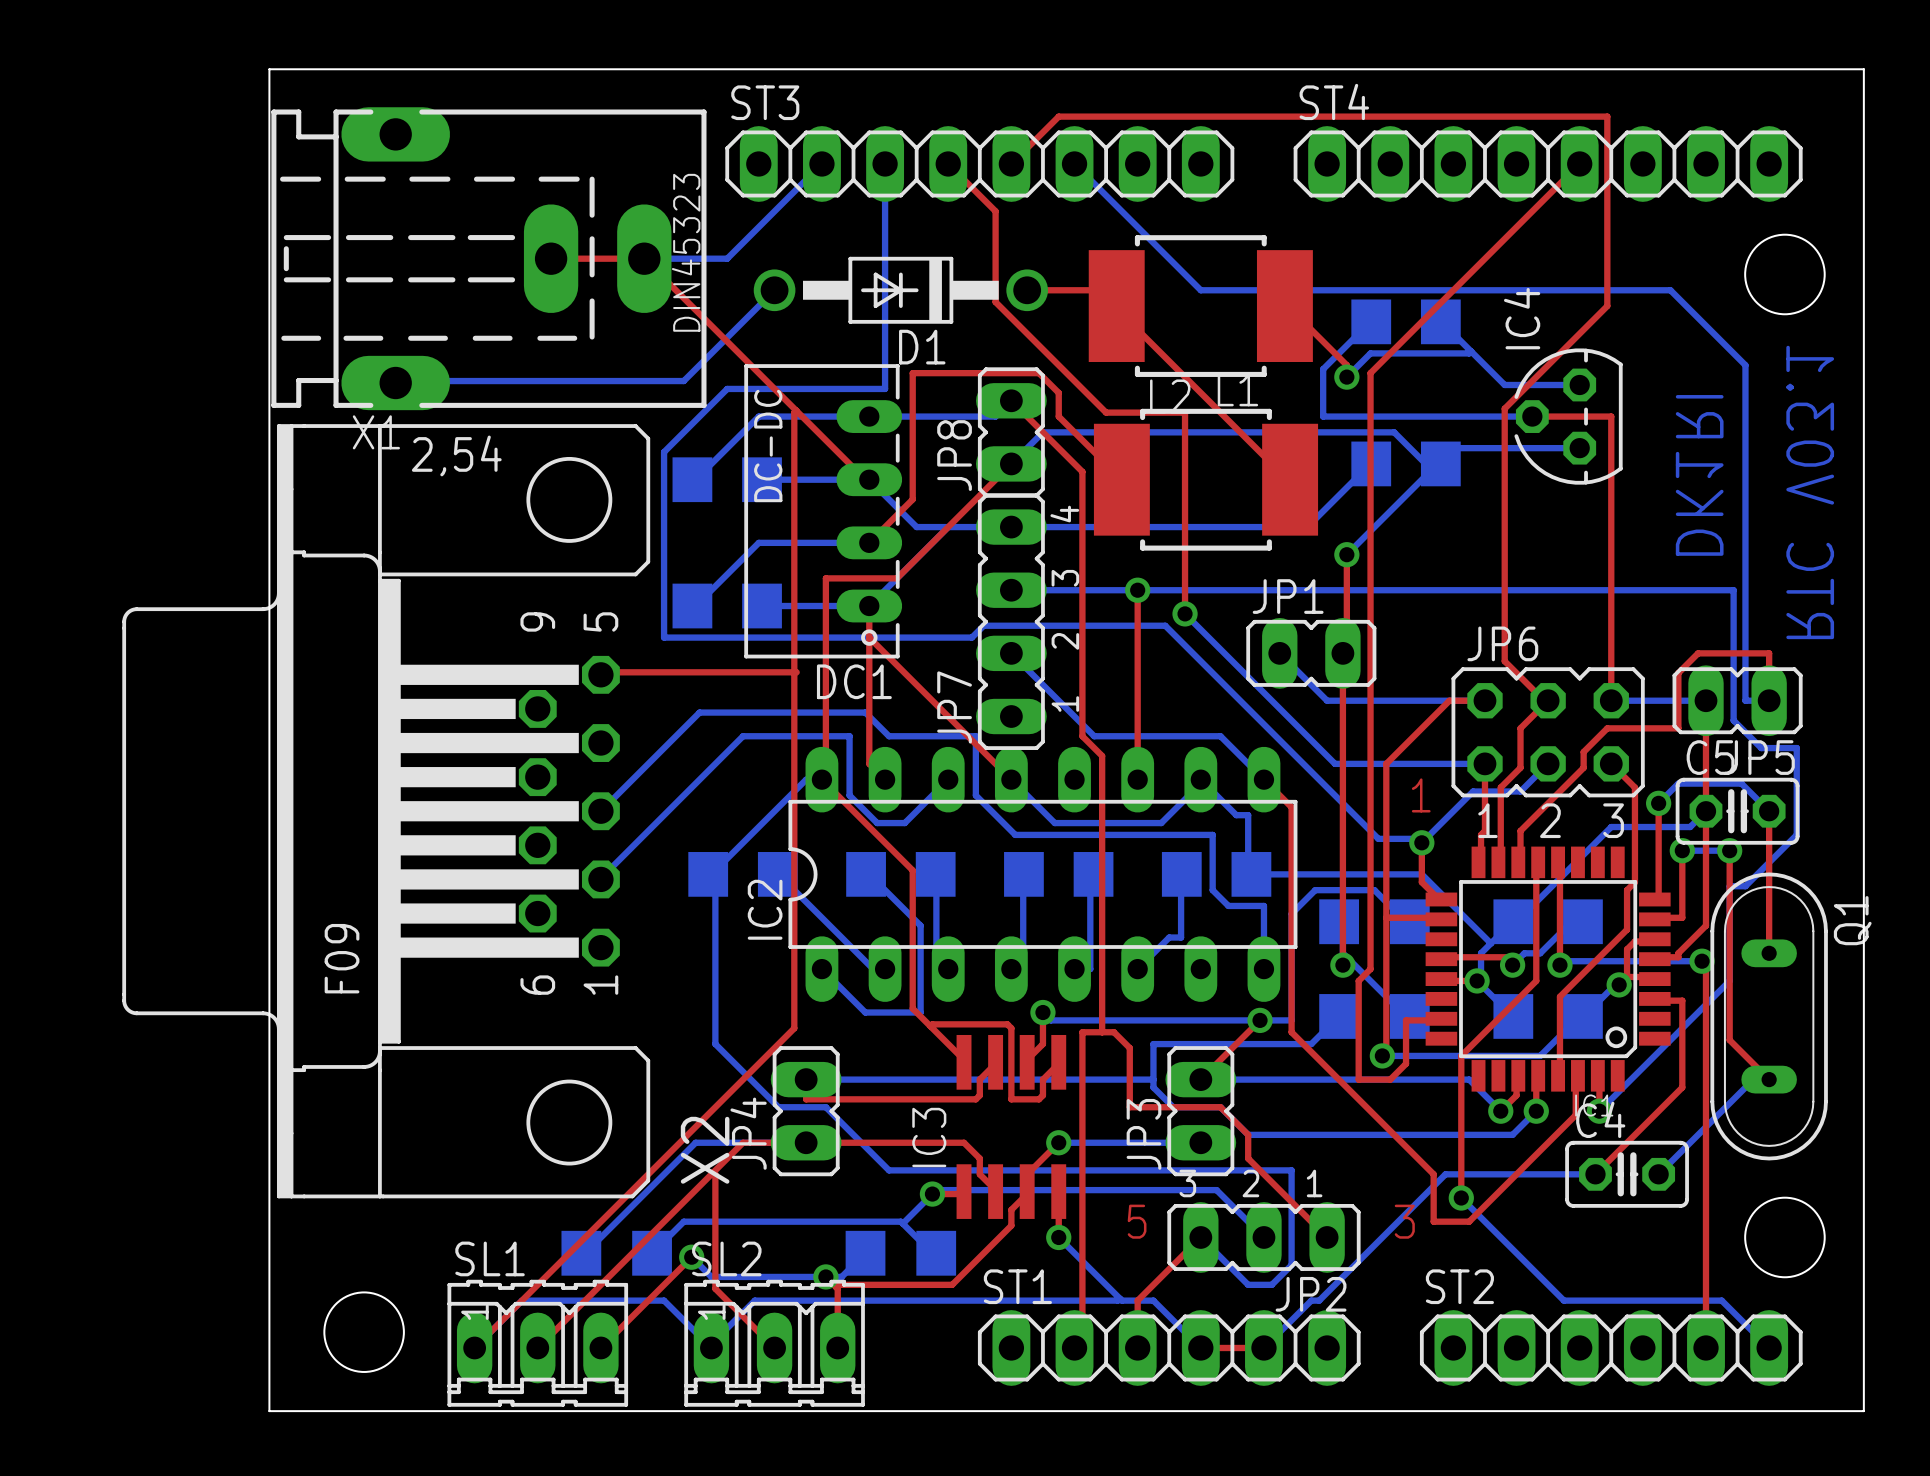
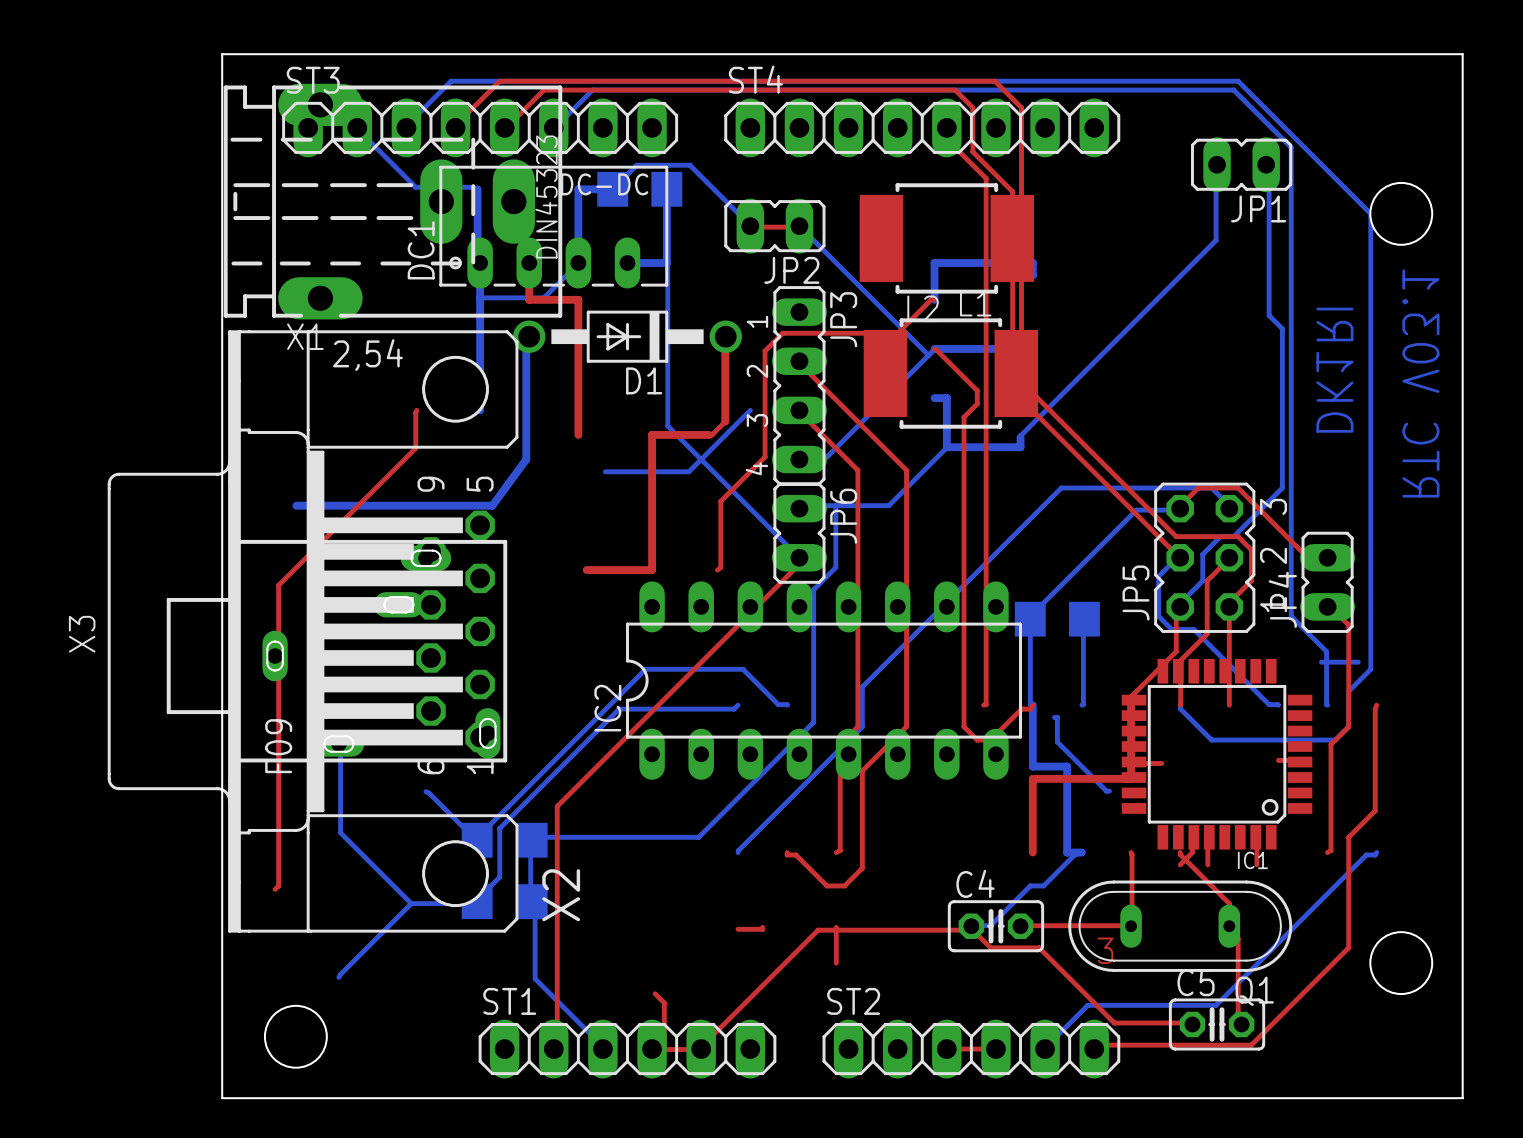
bottom track: none -> (357, 127) (415, 187) (473, 187) (477, 189) (477, 262) (480, 262) (480, 410)
bottom track: none -> (406, 127) (451, 81) (1238, 81) (1370, 213) (1370, 669) (1348, 691) (1348, 726) (1335, 740) (1211, 740) (1180, 709) (1180, 705)
top track: none -> (455, 127) (455, 125) (499, 81) (994, 81) (1021, 107) (1021, 381) (1176, 536) (1238, 536) (1251, 549) (1251, 580) (1229, 602) (1229, 705)
top track: none -> (504, 127) (543, 90) (955, 90) (972, 107) (972, 151) (1012, 191) (1012, 390) (1180, 557)
bottom track: none -> (553, 127) (592, 90) (1233, 90) (1291, 147) (1291, 616) (1326, 651) (1327, 705)
bottom track: (821, 163) (727, 258) (644, 258) -> none
bottom track: (885, 163) (885, 388) (727, 388) (664, 452) (664, 637) (971, 637) (983, 625) (1165, 625) (1378, 838) (1421, 838) (1421, 842) (1473, 791) (1520, 791) (1548, 763) -> none
top track: (948, 163) (995, 211) (995, 302) (1106, 412) (1185, 412) (1185, 613) -> none
ST3 position: (979, 163) -> (480, 127)
top track: (1011, 163) (1058, 116) (1607, 116) (1607, 306) (1504, 408) (1504, 661) (1544, 700) (1548, 700) (1520, 728) (1520, 767) (1500, 787) (1500, 858) (1498, 862) -> none
bottom track: (1074, 163) (1200, 290) (1670, 290) (1745, 365) (1745, 700) (1769, 700) -> none
top track: none -> (946, 127) (950, 129) (950, 143) (986, 178) (986, 704) (983, 705)
ST4 position: (1548, 163) -> (922, 127)
top track: (1579, 163) (1370, 373) (1370, 969) (1358, 980) (1358, 1079) (1390, 1079) (1406, 1063) (1406, 1020) (1441, 1018) -> none
bottom track: none -> (1217, 164) (1216, 240) (1021, 434) (1020, 447) (946, 447)
bottom track: none -> (1266, 164) (1269, 165) (1269, 315) (1282, 328) (1282, 488) (1233, 536) (1220, 536) (1202, 554) (1202, 580) (1180, 602) (1180, 606)
part: none -> (639, 189)
bottom track: none -> (666, 189) (666, 262) (627, 262)
top track: (551, 258) (644, 258) (865, 479) (869, 479) -> none
bottom track: (774, 290) (683, 381) (395, 381) (395, 383) -> none
D1 position: (900, 290) -> (627, 336)
bottom track: none -> (750, 226) (689, 165) (636, 165) (612, 189) (578, 189) (578, 262) (543, 297) (480, 297)
top track: none -> (750, 226) (799, 226)
bottom track: none -> (799, 226) (928, 355) (934, 348)
top track: (1027, 290) (1113, 290) (1113, 306) (1117, 306) (1117, 310) (1287, 479) (1290, 479) -> none
top track: (1284, 306) (1287, 306) (1346, 365) (1346, 377) -> none
bottom track: (1371, 321) (1323, 369) (1323, 416) (1532, 416) -> none
part: (1406, 321) -> none
bottom track: (1440, 321) (1504, 384) (1579, 384) -> none
top track: none -> (529, 262) (529, 299) (578, 299) (578, 434)
bottom track: none -> (666, 262) (667, 426) (799, 557)
bottom track: none -> (1020, 272) (1020, 275) (1032, 275) (1032, 262) (934, 262) (934, 299)
bottom track: (1471, 351) (1469, 353) (1370, 353) (1346, 377) -> none
via: (1346, 377) -> none
top track: none -> (934, 299) (933, 297) (897, 333) (782, 333) (765, 350) (765, 457) (720, 501) (720, 567) (717, 570)
bottom track: (1011, 400) (995, 416) (758, 416) (695, 479) (692, 479) -> none
top track: (1011, 400) (1082, 471) (1082, 736) (1102, 755) (1102, 1032) -> none
top track: (796, 410) (794, 412) (794, 1028) (474, 1347) -> none
top track: (1532, 416) (1611, 416) (1611, 700) -> none
IC4: (1568, 416) -> none
bottom track: none -> (529, 336) (526, 337) (526, 459) (492, 505) (295, 507)
top track: none -> (725, 336) (725, 421) (712, 434) (652, 434) (652, 570) (586, 570)
JP8: (1011, 432) -> none
bottom track: none -> (934, 348) (1020, 348)
top track: none -> (934, 348) (977, 390) (977, 403) (964, 417) (964, 726) (977, 740) (990, 740) (1021, 709) (1030, 709) (1032, 705)
bottom track: (1579, 448) (1457, 448) (1441, 463) (1437, 463) (1346, 554) -> none
bottom track: (1011, 463) (1042, 432) (1394, 432) (1429, 467) (1440, 463) -> none
top track: (1011, 463) (896, 578) (825, 578) (825, 779) (821, 779) (912, 870) (912, 1008) (964, 1059) (964, 1062) -> (799, 361) (906, 470) (906, 726) (862, 770) (862, 868) (844, 885) (826, 885) (796, 854) (787, 854) (787, 852)
bottom track: (1371, 463) (1307, 527) (916, 527) (869, 479) (762, 479) -> none
part: (1406, 463) -> none
part: (727, 479) -> none
top track: (1121, 479) (1058, 416) (1058, 392) (1039, 373) (912, 373) (912, 499) (869, 542) -> none
DC1 rotation: 0° (823, 511) -> 90° clockwise (553, 227)
DC1 position: (823, 511) -> (553, 227)
bottom track: none -> (934, 398) (946, 398) (946, 447)
top track: none -> (416, 410) (415, 448) (278, 585) (278, 885) (275, 889)
top track: none -> (799, 410) (857, 470) (857, 726) (840, 744) (840, 850) (836, 852)
bottom track: (869, 542) (758, 542) (695, 606) (692, 606) -> none
top track: (1346, 554) (1346, 649) (1342, 653) (1342, 965) -> none
via: (1346, 554) -> none
bottom track: (1011, 590) (1733, 590) (1733, 720) (1761, 748) (1796, 748) (1796, 834) (1745, 886) (1729, 886) (1729, 980) (1599, 1111) -> (799, 459) (800, 457) (826, 457) (934, 348)
top track: (1137, 590) (1137, 779) -> none
via: (1137, 590) -> none
JP1 name position: JP1 (1288, 596) -> JP1 (1258, 208)
part: (727, 606) -> none
top track: (869, 606) (869, 763) (885, 779) -> none
bottom track: (1185, 613) (1335, 763) (1484, 763) -> none
via: (1185, 613) -> none
JP7: (1011, 621) -> none
top track: (869, 637) (1011, 779) -> none
JP6 name position: JP6 (1502, 643) -> JP6 (843, 516)
bottom track: none -> (835, 505) (835, 567) (813, 589) (813, 722) (698, 837) (535, 837) (530, 841) (530, 899) (535, 903) (535, 978) (601, 1045) (602, 1049)
bottom track: (1011, 653) (1094, 736) (1220, 736) (1263, 779) -> (799, 508) (800, 505) (888, 505) (946, 447)
bottom track: (1279, 653) (1327, 700) (1484, 700) -> none
JP1 position: (1311, 653) -> (1241, 164)
bottom track: none -> (1180, 508) (1136, 510) (1030, 616) (1032, 766) (1067, 766) (1067, 852) (1081, 852) (1074, 854) (1043, 885) (1030, 885) (990, 925) (971, 926)
top track: none -> (1180, 508) (1180, 505) (1198, 488) (1238, 488) (1304, 554) (1326, 554) (1327, 557)
bottom track: none -> (1229, 508) (1229, 505) (1211, 488) (1061, 488) (862, 686) (862, 726) (738, 852)
JP5 footprint: [1672, 665, 1803, 737] -> [1154, 482, 1256, 633]
JP6 footprint: [1451, 667, 1645, 798] -> [771, 482, 827, 584]
top track: (796, 672) (603, 672) (600, 674) -> none
top track: (1484, 700) (1449, 700) (1386, 763) (1386, 1051) (1382, 1055) -> none
bottom track: (1611, 700) (1706, 700) -> none
top track: (1706, 700) (1706, 925) (1678, 953) (1678, 957) (1658, 957) (1654, 959) -> none
top track: (1769, 700) (1769, 653) (1698, 653) (1678, 673) (1678, 728) (1607, 728) (1583, 752) (1583, 767) (1520, 830) (1520, 858) (1518, 862) -> none
top track: none -> (799, 557) (796, 558) (796, 567) (557, 806) (557, 1045) (553, 1049)
bottom track: none -> (1180, 557) (1176, 558) (1158, 576) (1158, 616) (1171, 629) (1193, 629) (1269, 704) (1278, 705)
top track: none -> (1229, 557) (1207, 580) (1207, 633) (1180, 660) (1180, 705)
JP5 name position: JP5 (1759, 757) -> JP5 (1135, 593)
top track: (1484, 763) (1484, 830) (1481, 834) (1481, 858) (1478, 862) -> none
top track: (1611, 763) (1634, 787) (1634, 882) (1627, 890) (1627, 929) (1559, 996) (1559, 1075) (1558, 1075) -> none
bottom track: (821, 779) (806, 779) (711, 874) -> none
bottom track: (948, 779) (904, 823) (877, 823) (849, 795) (849, 736) (743, 736) (600, 879) -> none
bottom track: (1011, 779) (1054, 823) (1161, 823) (1200, 783) (1200, 779) (1236, 815) (1248, 815) (1248, 874) (1421, 874) (1490, 943) -> none
top track: (1263, 779) (1291, 807) (1291, 1032) (1433, 1174) (1433, 1221) (1469, 1221) (1575, 1115) (1575, 1079) (1577, 1075) -> none
top track: none -> (1180, 606) (1176, 607) (1176, 651) (1132, 695) (1131, 778) (1032, 778) (1032, 852)
top track: none -> (1327, 606) (1331, 607) (1348, 625) (1348, 726) (1331, 744) (1331, 850) (1327, 852)
part: none -> (1057, 619)
bottom track: none -> (1084, 619) (1081, 705)
text: 1 (1421, 795) -> none
bottom track: (1658, 803) (1678, 783) (1741, 783) (1769, 811) -> none
top track: (1658, 803) (1658, 898) (1654, 899) -> none
via: (1658, 803) -> none
bottom track: (600, 811) (699, 712) (865, 712) (889, 736) (975, 736) (975, 795) (1015, 834) (1212, 834) (1212, 890) (1228, 905) (1263, 905) (1263, 969) -> none
bottom track: (1706, 811) (1690, 827) (1611, 827) (1516, 921) (1512, 921) (1481, 953) (1481, 980) (1477, 980) (1513, 1016) -> none
C5 position: (1737, 811) -> (1217, 1024)
top track: (1769, 811) (1769, 953) -> none
X3: none -> (336, 651)
top track: (1421, 842) (1421, 882) (1441, 899) -> none
via: (1421, 842) -> none
top track: (1682, 850) (1682, 917) (1654, 919) -> none
via: (1682, 850) -> none
top track: (1729, 850) (1729, 1040) (1769, 1079) -> none
via: (1729, 850) -> none
top track: (1538, 862) (1536, 862) (1536, 980) (1461, 1055) (1461, 1198) -> none
top track: (1558, 862) (1559, 862) (1559, 965) -> none
bottom track: (708, 874) (715, 874) (715, 1044) (778, 1107) (825, 1107) (889, 1170) (1291, 1170) (1291, 1265) (1271, 1284) (1248, 1284) (1200, 1237) -> none
part: (743, 874) -> none
bottom track: (777, 874) (873, 969) (885, 969) -> none
bottom track: (866, 874) (869, 874) (920, 925) (920, 1012) (865, 1012) (821, 969) -> none
part: (900, 874) -> none
bottom track: (935, 874) (936, 969) (948, 969) -> none
bottom track: (1023, 874) (1023, 969) (1011, 969) -> none
part: (1058, 874) -> none
bottom track: (1093, 874) (1090, 874) (1090, 969) (1074, 969) -> none
bottom track: (1181, 874) (1181, 937) (1169, 937) (1137, 969) -> none
part: (1216, 874) -> none
bottom track: none -> (738, 705) (734, 709) (619, 709) (499, 828) (499, 877) (477, 901) (473, 903) (411, 903)
bottom track: none -> (787, 705) (778, 704) (742, 669) (645, 669) (477, 837) (477, 840) (425, 791)
top track: none -> (1376, 705) (1375, 810) (1348, 837) (1348, 947) (1251, 1045) (1096, 1045) (1094, 1049)
top track: (1386, 917) (1441, 919) -> none
part: (1374, 921) -> none
bottom track: (1409, 921) (1406, 921) (1374, 890) (1315, 890) (1291, 913) (1291, 1020) (1050, 1020) (1042, 1012) -> none
part: (1548, 921) -> none
bottom track: (1582, 921) (1571, 921) (1540, 953) (1524, 953) (1512, 965) -> none
top track: (1654, 939) (1654, 941) (1634, 941) (1627, 949) (1627, 976) (1619, 984) -> none
bottom track: none -> (338, 744) (340, 744) (340, 832) (411, 903)
top track: (1441, 959) (1441, 957) (1512, 957) (1512, 965) -> none
bottom track: (1702, 961) (1563, 961) (1559, 965) -> none
top track: (1702, 961) (1706, 965) (1706, 1347) -> none
via: (1702, 961) -> none
via: (1342, 965) -> none
via: (1512, 965) -> none
via: (1559, 965) -> none
via: (1477, 980) -> none
bottom track: (1619, 984) (1615, 984) (1583, 1016) (1579, 1016) (1540, 1055) (1382, 1055) -> none
via: (1619, 984) -> none
top track: (1654, 998) (1682, 1000) (1682, 1087) (1595, 1174) -> none
top track: (1042, 1012) (1042, 1044) (1027, 1059) (1027, 1062) -> none
via: (1042, 1012) -> none
bottom track: (1338, 1016) (1311, 1044) (1153, 1044) (1153, 1087) (1173, 1107) (1220, 1107) (1248, 1134) (1512, 1134) (1536, 1111) -> none
part: (1374, 1016) -> none
part: (1548, 1016) -> none
Q1 rotation: 0° (1769, 1016) -> 90° clockwise (1180, 926)
Q1 position: (1769, 1016) -> (1180, 926)
top track: (1260, 1020) (1200, 1079) -> none
via: (1260, 1020) -> none
top track: (930, 1026) (932, 1024) (1007, 1024) (1011, 1028) (1011, 1099) (1039, 1099) (1042, 1095) (1042, 1079) (1058, 1062) -> none
JP3 footprint: [1165, 1046, 1237, 1177] -> [771, 286, 827, 486]
via: (1382, 1055) -> none
top track: (995, 1062) (979, 1079) (979, 1095) (975, 1099) (806, 1099) (806, 1079) -> none
part: none -> (504, 840)
bottom track: (806, 1079) (1153, 1079) -> none
bottom track: (1200, 1079) (1469, 1079) (1500, 1111) -> none
bottom track: (1769, 1079) (1753, 1079) (1658, 1174) -> none
top track: none -> (1131, 852) (1132, 925) (1020, 926)
top track: none -> (1180, 852) (1229, 903) (1229, 930) (1238, 939) (1238, 1023) (1241, 1024)
bottom track: none -> (1376, 852) (1375, 854) (1366, 854) (1216, 1005) (1087, 1005) (1045, 1049)
JP4 position: (806, 1111) -> (1327, 582)
via: (1500, 1111) -> none
via: (1536, 1111) -> none
via: (1599, 1111) -> none
IC3: (1011, 1126) -> none
JP3 name position: JP3 (1143, 1134) -> JP3 (843, 319)
bottom track: (806, 1142) (695, 1142) (585, 1253) (581, 1253) -> none
bottom track: (1058, 1142) (1200, 1142) -> none
top track: (1058, 1142) (1027, 1174) (1027, 1194) (1011, 1209) (1011, 1225) (952, 1284) (837, 1284) (835, 1286) -> none
via: (1058, 1142) -> none
part: none -> (504, 901)
bottom track: none -> (411, 903) (338, 977)
top track: (713, 1172) (715, 1174) (715, 1288) (774, 1347) -> none
bottom track: (1595, 1174) (1445, 1174) (1319, 1300) (1311, 1300) (1263, 1347) -> none
C4 position: (1627, 1174) -> (995, 926)
top track: (995, 1191) (979, 1174) (979, 1158) (964, 1142) (743, 1142) (537, 1347) -> none
via: (932, 1194) -> none
bottom track: (1461, 1198) (1563, 1300) (1721, 1300) (1769, 1347) -> none
via: (1461, 1198) -> none
JP2 footprint: [1167, 1202, 1361, 1273] -> [724, 198, 826, 254]
text: 5 (1137, 1221) -> none
bottom track: (902, 1223) (936, 1190) (1216, 1190) (1263, 1237) -> none
bottom track: (1058, 1237) (1121, 1300) (1153, 1300) (1200, 1347) -> none
via: (1058, 1237) -> none
top track: (1200, 1237) (1137, 1300) (1137, 1347) -> none
top track: (1327, 1237) (1248, 1158) (1248, 1134) (1220, 1107) (1129, 1107) (1129, 1048) (1113, 1032) (1082, 1032) (1082, 1340) (1074, 1347) -> none
part: (616, 1253) -> none
bottom track: (652, 1253) (683, 1221) (900, 1221) (932, 1253) (936, 1253) -> none
bottom track: (865, 1253) (841, 1276) (711, 1276) (691, 1257) -> none
part: (900, 1253) -> none
top track: (691, 1257) (600, 1347) -> none
via: (691, 1257) -> none
via: (825, 1276) -> none
bottom track: (1119, 1298) (1117, 1300) (754, 1300) (711, 1344) (711, 1347) (664, 1300) (521, 1300) (474, 1347) -> none
top track: none -> (1192, 1024) (1114, 1023) (1039, 947) (990, 947) (972, 930) (971, 926) (968, 930) (818, 930) (701, 1049) (652, 1049)
SL1: (537, 1343) -> none
SL2: (774, 1343) -> none
ST1 position: (1169, 1347) -> (627, 1049)
ST2 position: (1611, 1347) -> (971, 1049)

